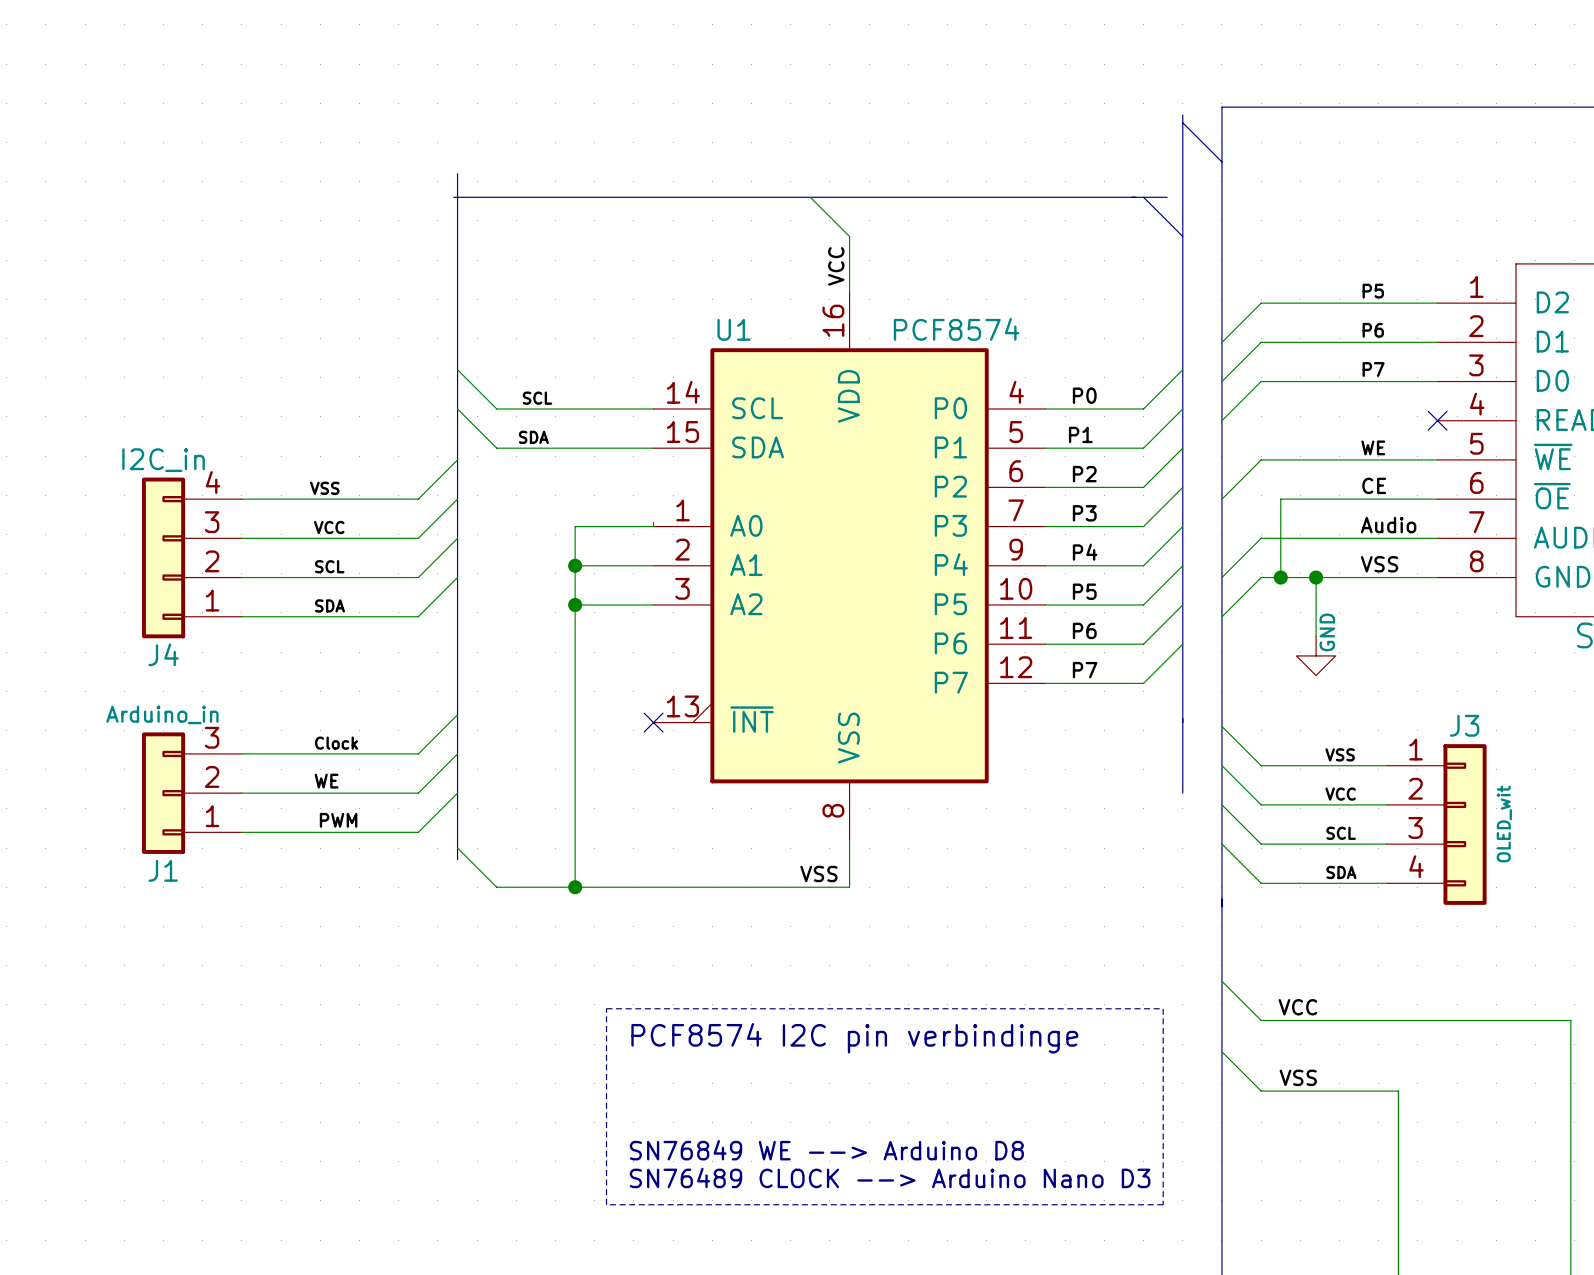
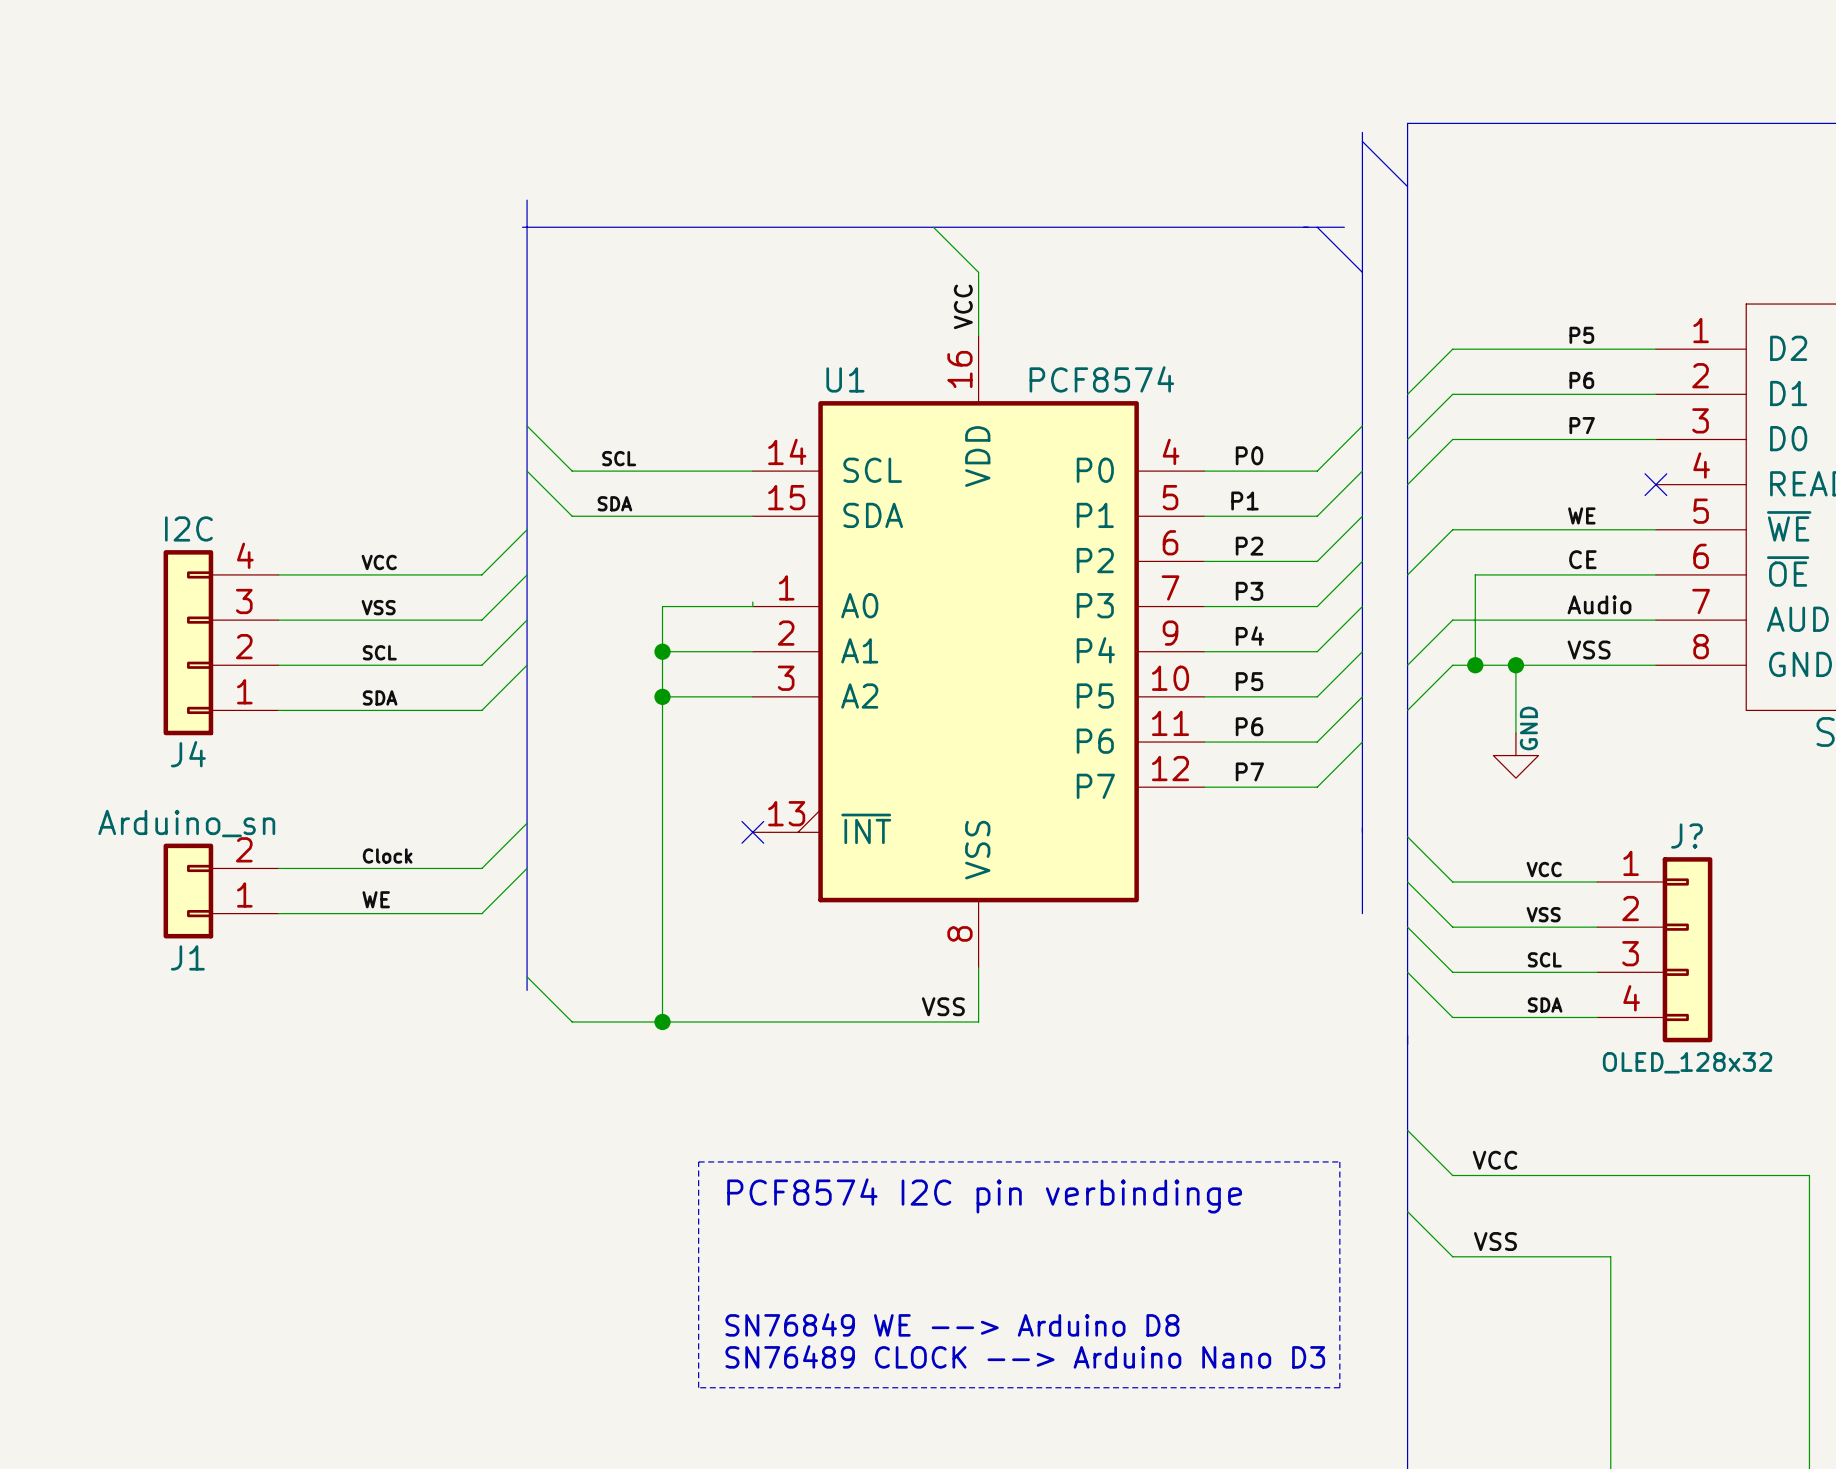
J4 value: I2C_in (163, 460) -> I2C (188, 528)
label: VSS (324, 488) -> VCC (379, 562)
label: VCC (329, 527) -> VSS (378, 607)
J1 value: Arduino_in (162, 714) -> Arduino_sn (186, 823)
J3 name: J3 (1464, 725) -> J? (1686, 836)
J1 symbol: [141, 732, 242, 854] -> [163, 843, 279, 939]
label: VSS (1340, 754) -> VCC (1544, 869)
wire: (457, 793) (418, 832) (241, 832) -> none
label: VCC (1340, 794) -> VSS (1543, 914)
label: PWM (338, 820) -> none
J3 value: OLED_wit (1504, 823) -> OLED_128x32 (1687, 1062)

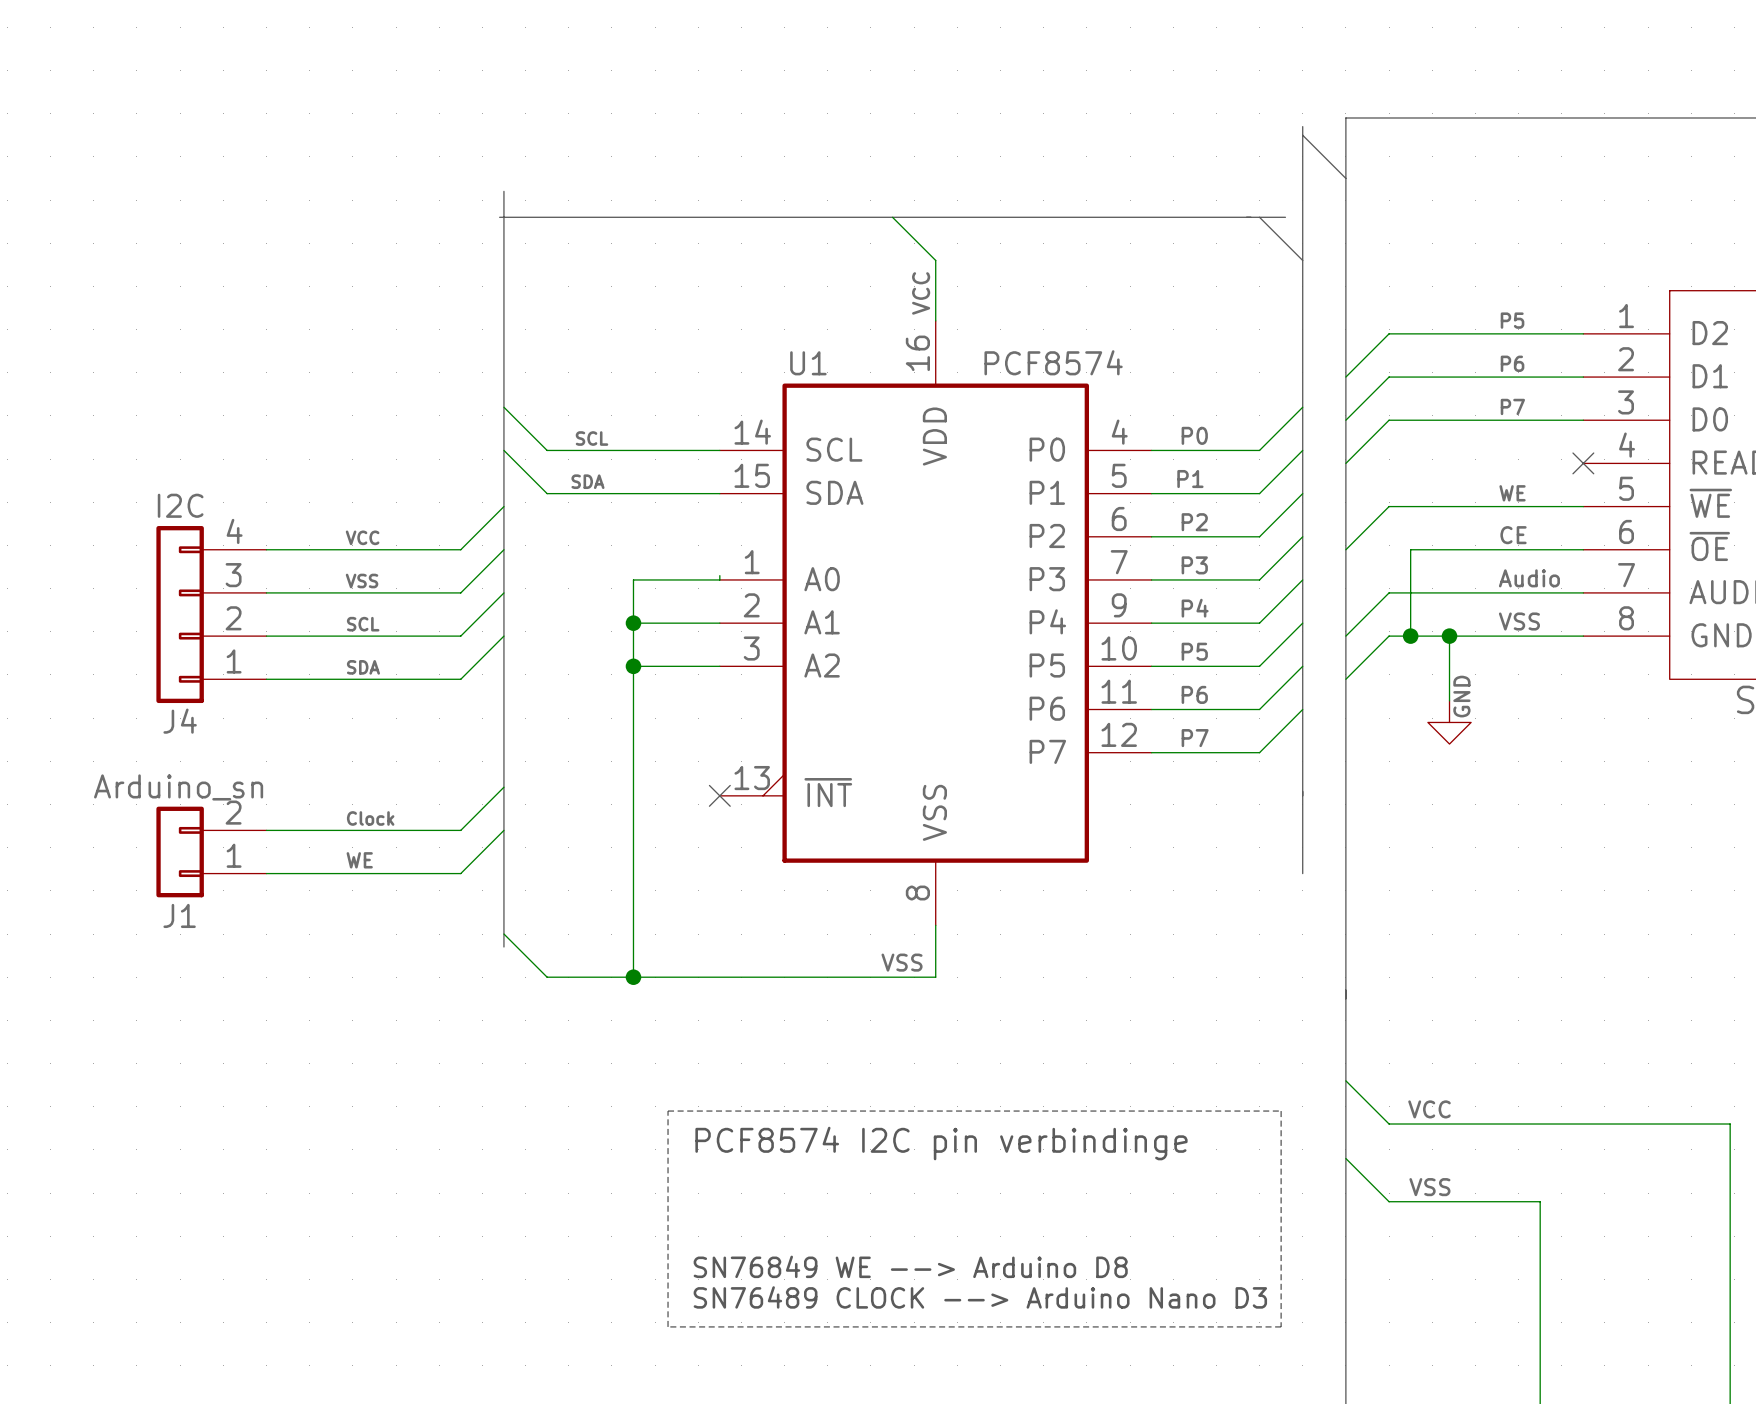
wire: (1407, 836) (1452, 882) (1597, 882) -> none
label: VCC (1544, 869) -> none
wire: (1407, 882) (1452, 927) (1597, 927) -> none
label: VSS (1543, 914) -> none
wire: (1407, 927) (1452, 972) (1597, 972) -> none
J?: OLED_128x32 (1654, 949) -> none
label: SCL (1544, 959) -> none
wire: (1407, 972) (1452, 1017) (1597, 1017) -> none
label: SDA (1545, 1004) -> none

